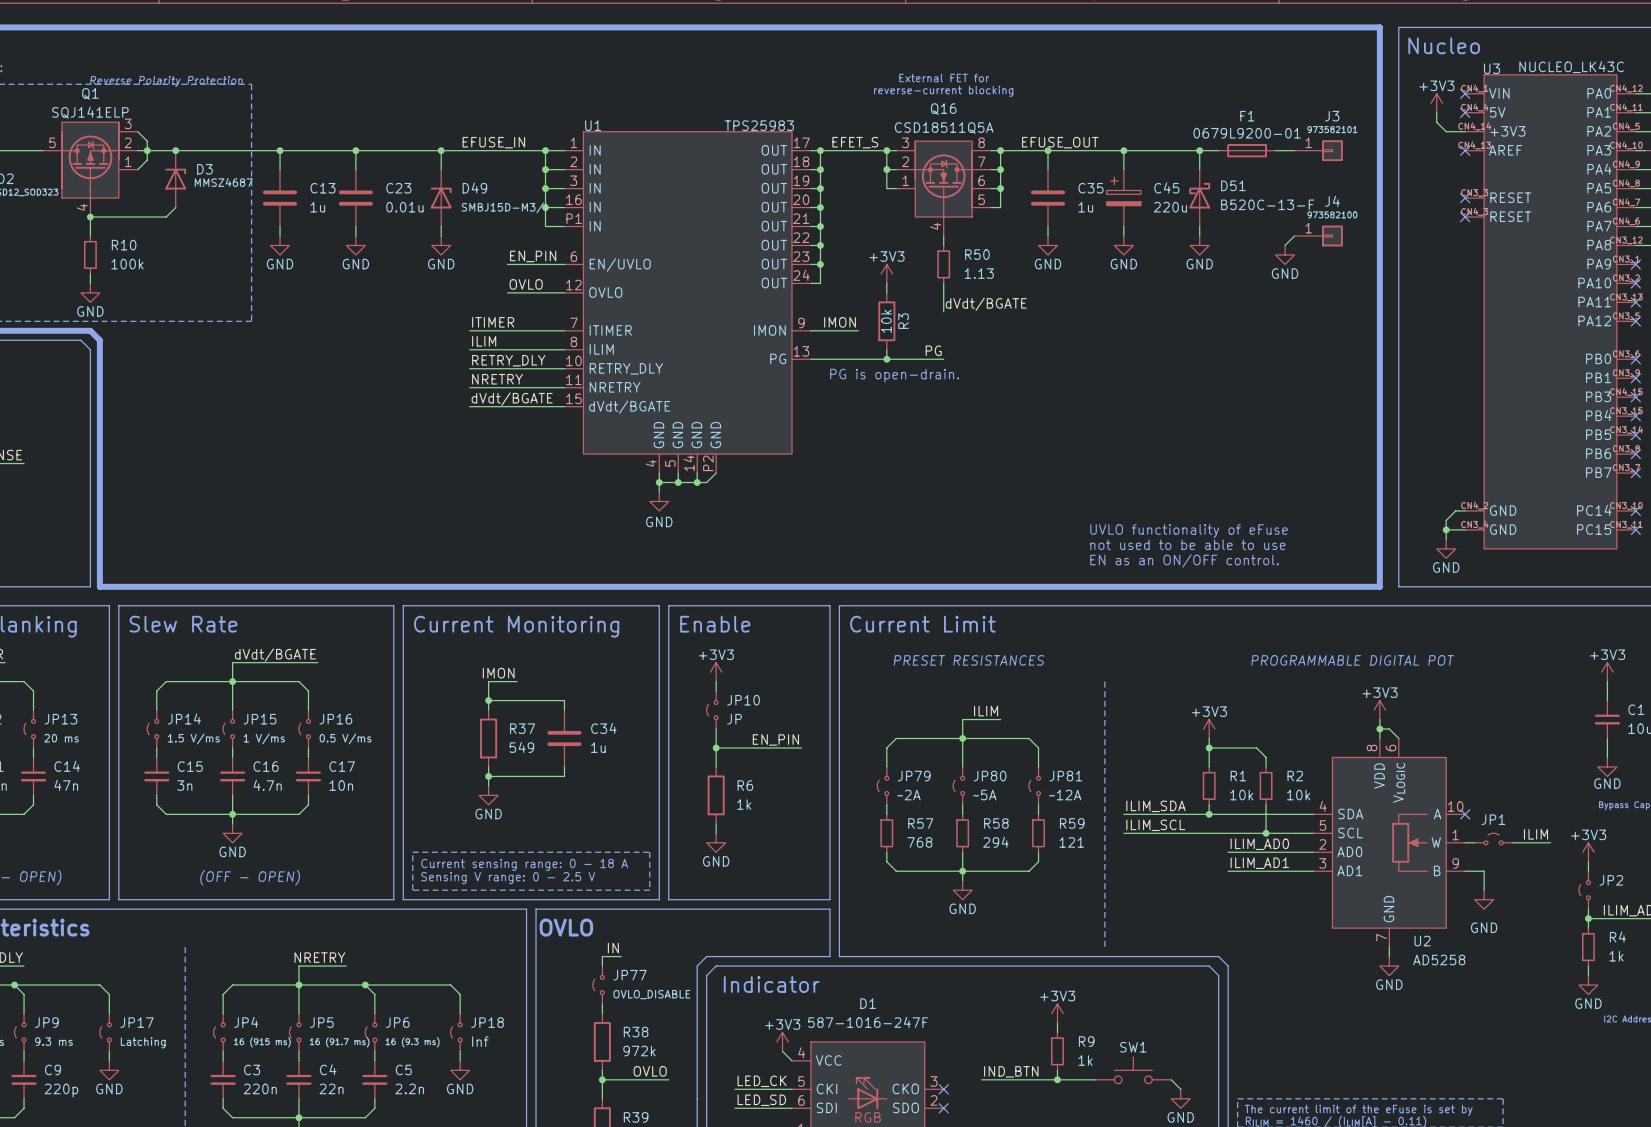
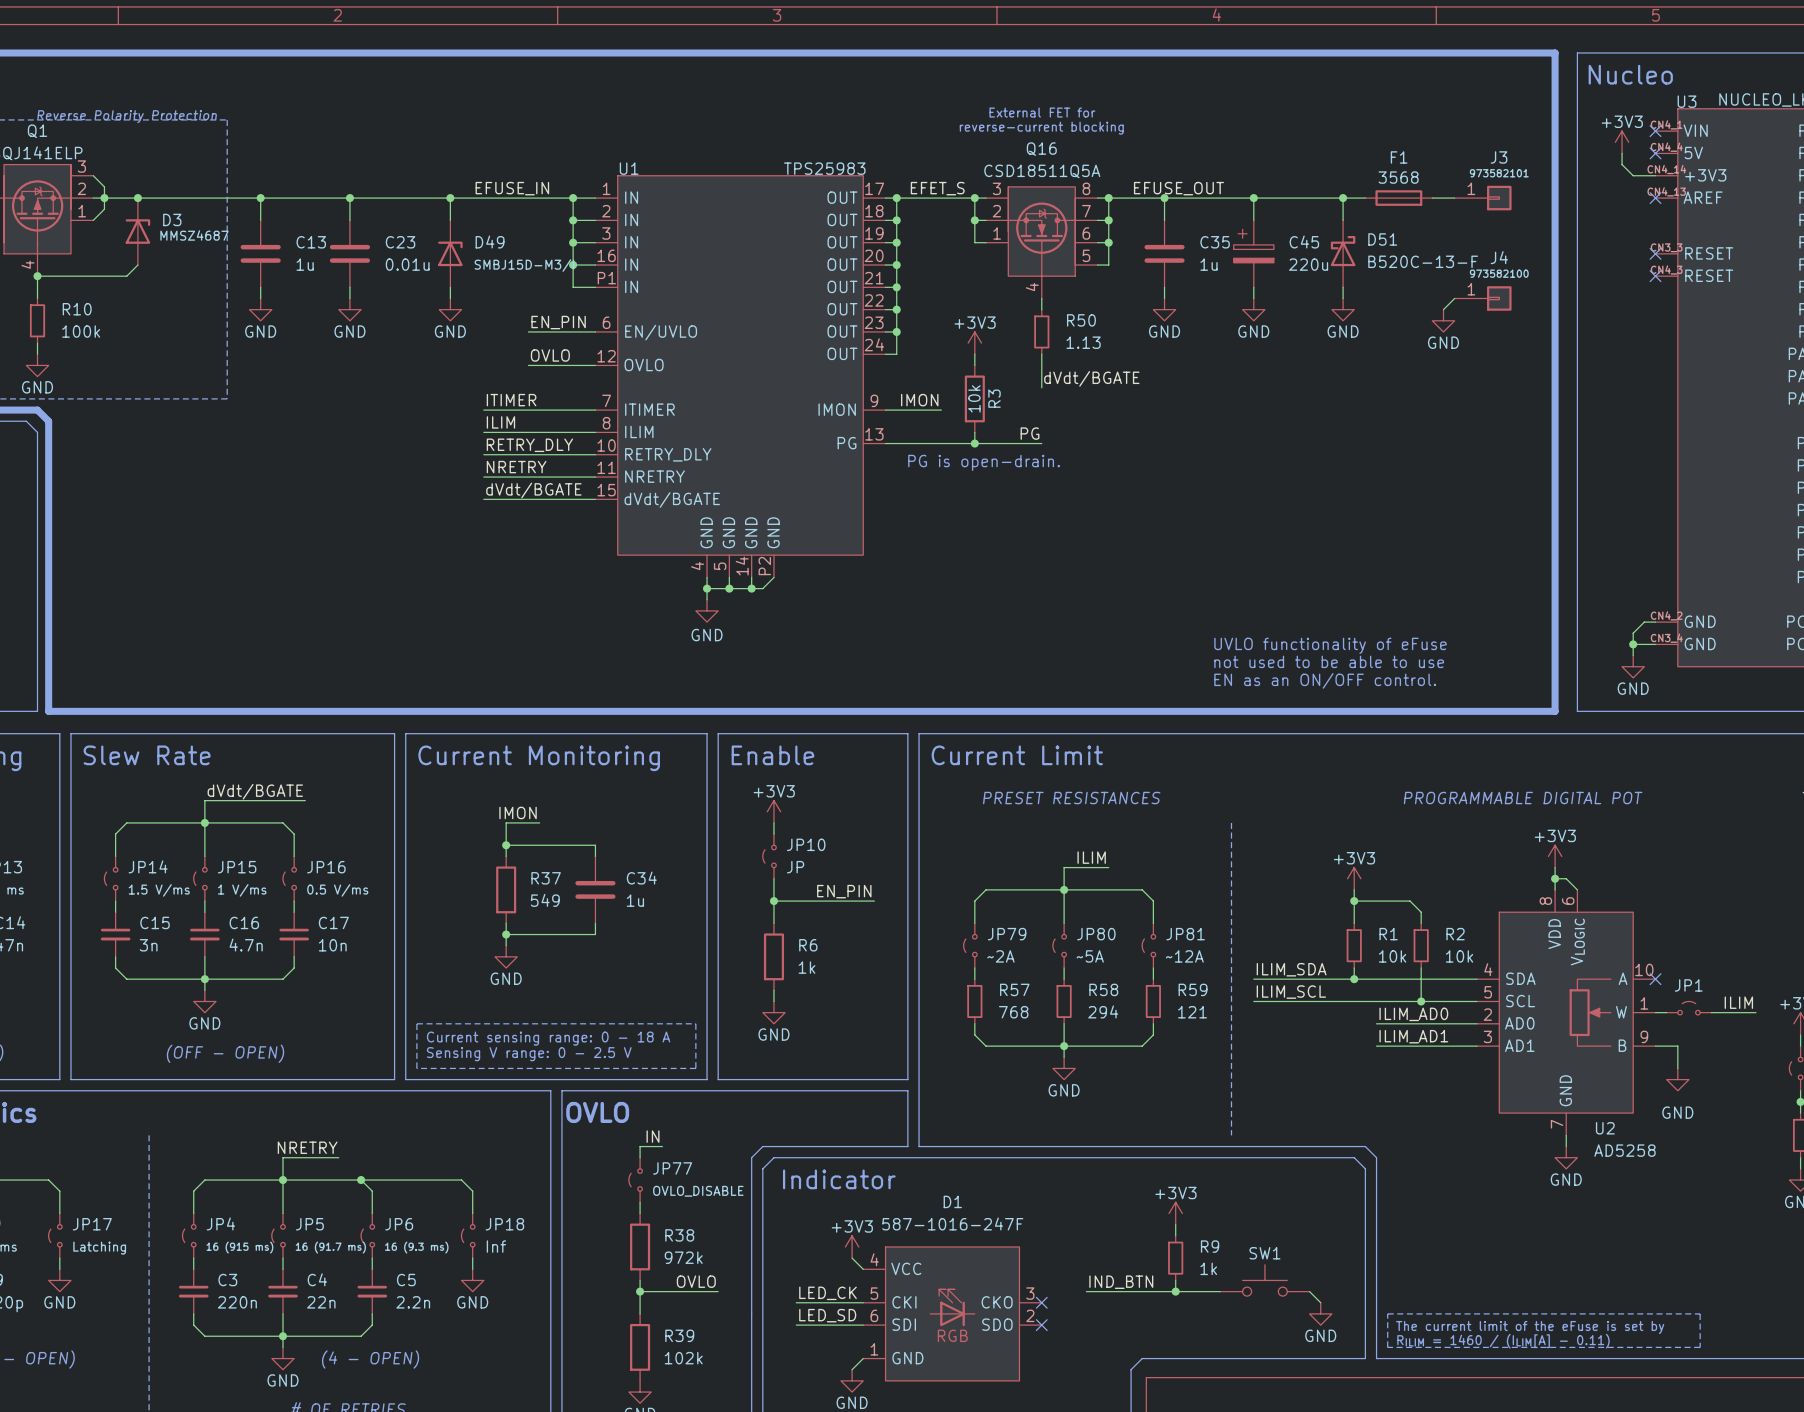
F1 value: 0679L9200-01 (1247, 133) -> 3568 (1398, 177)

